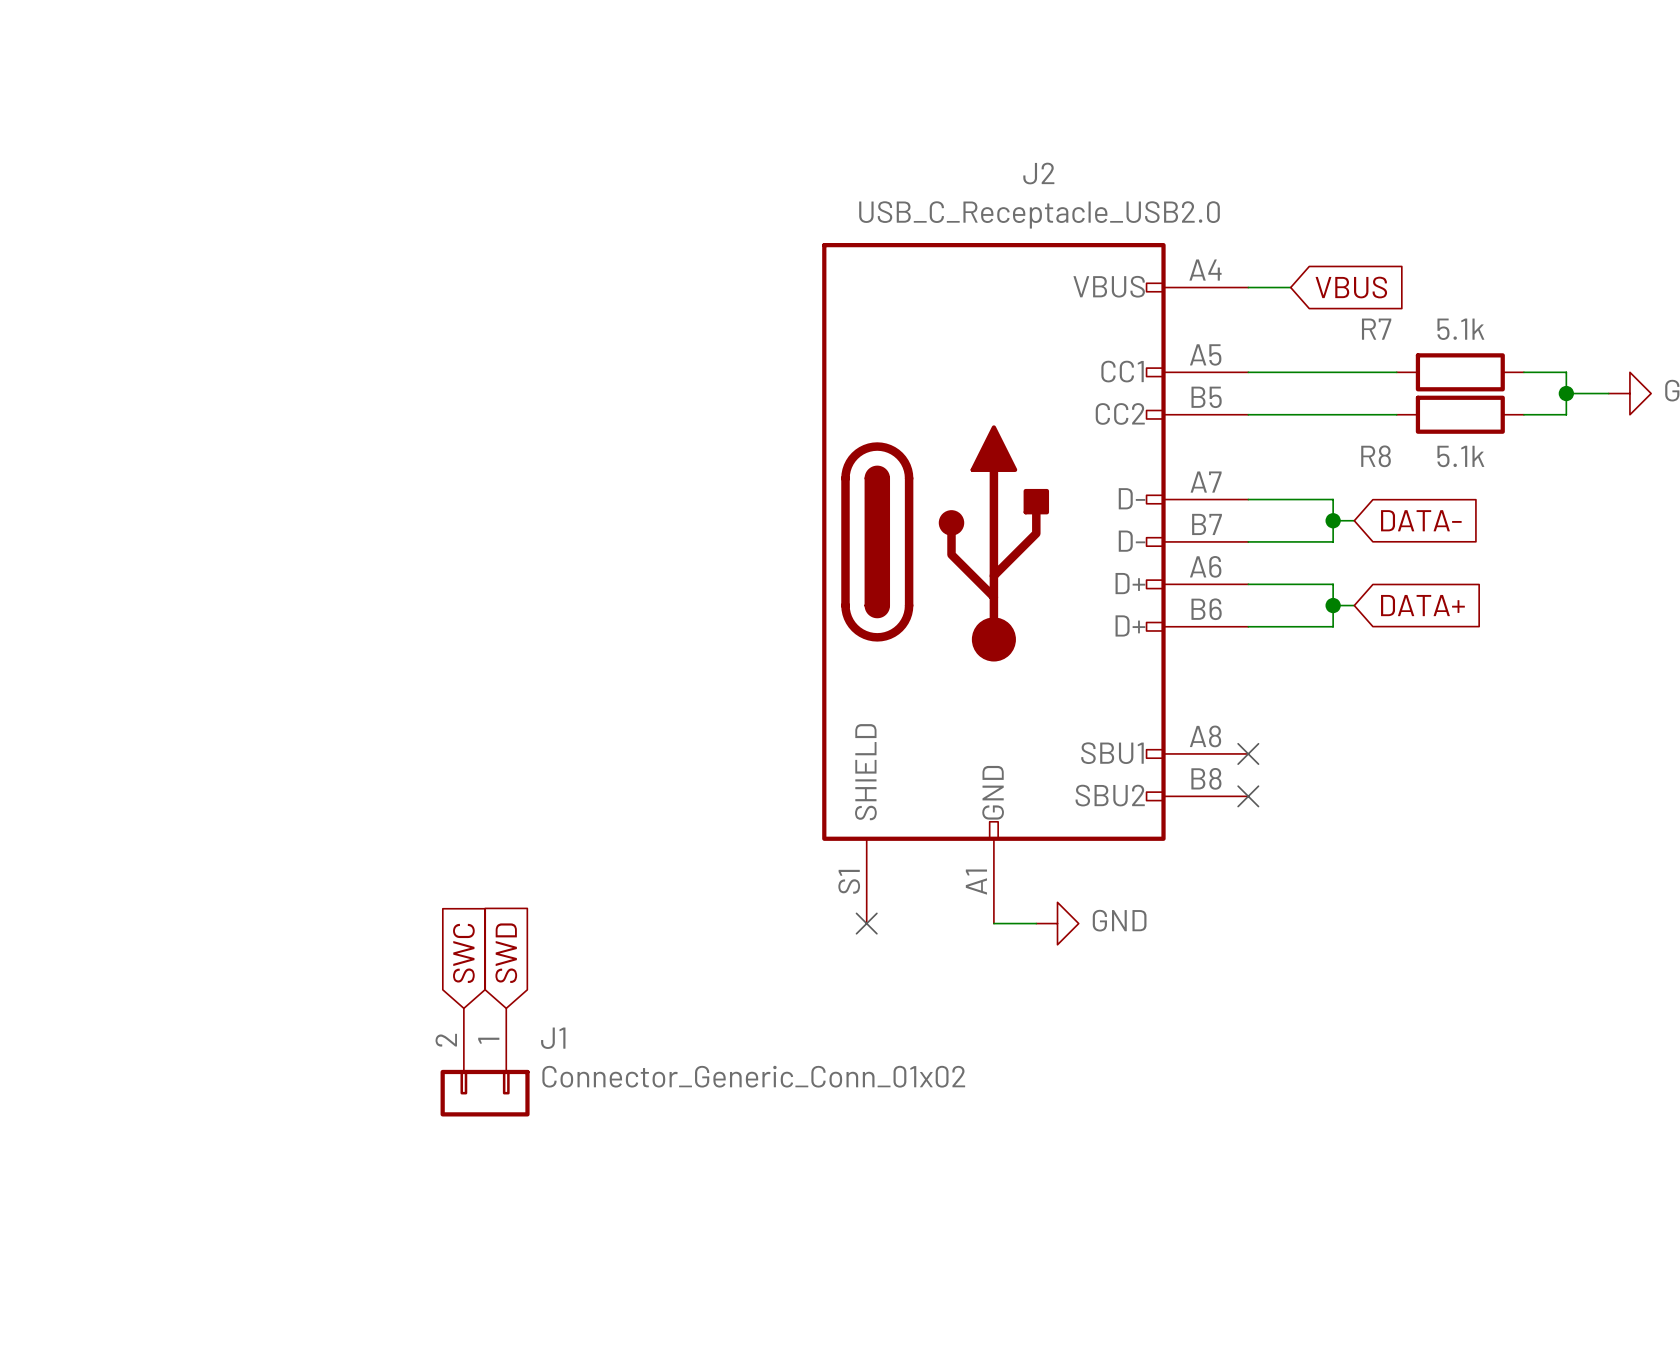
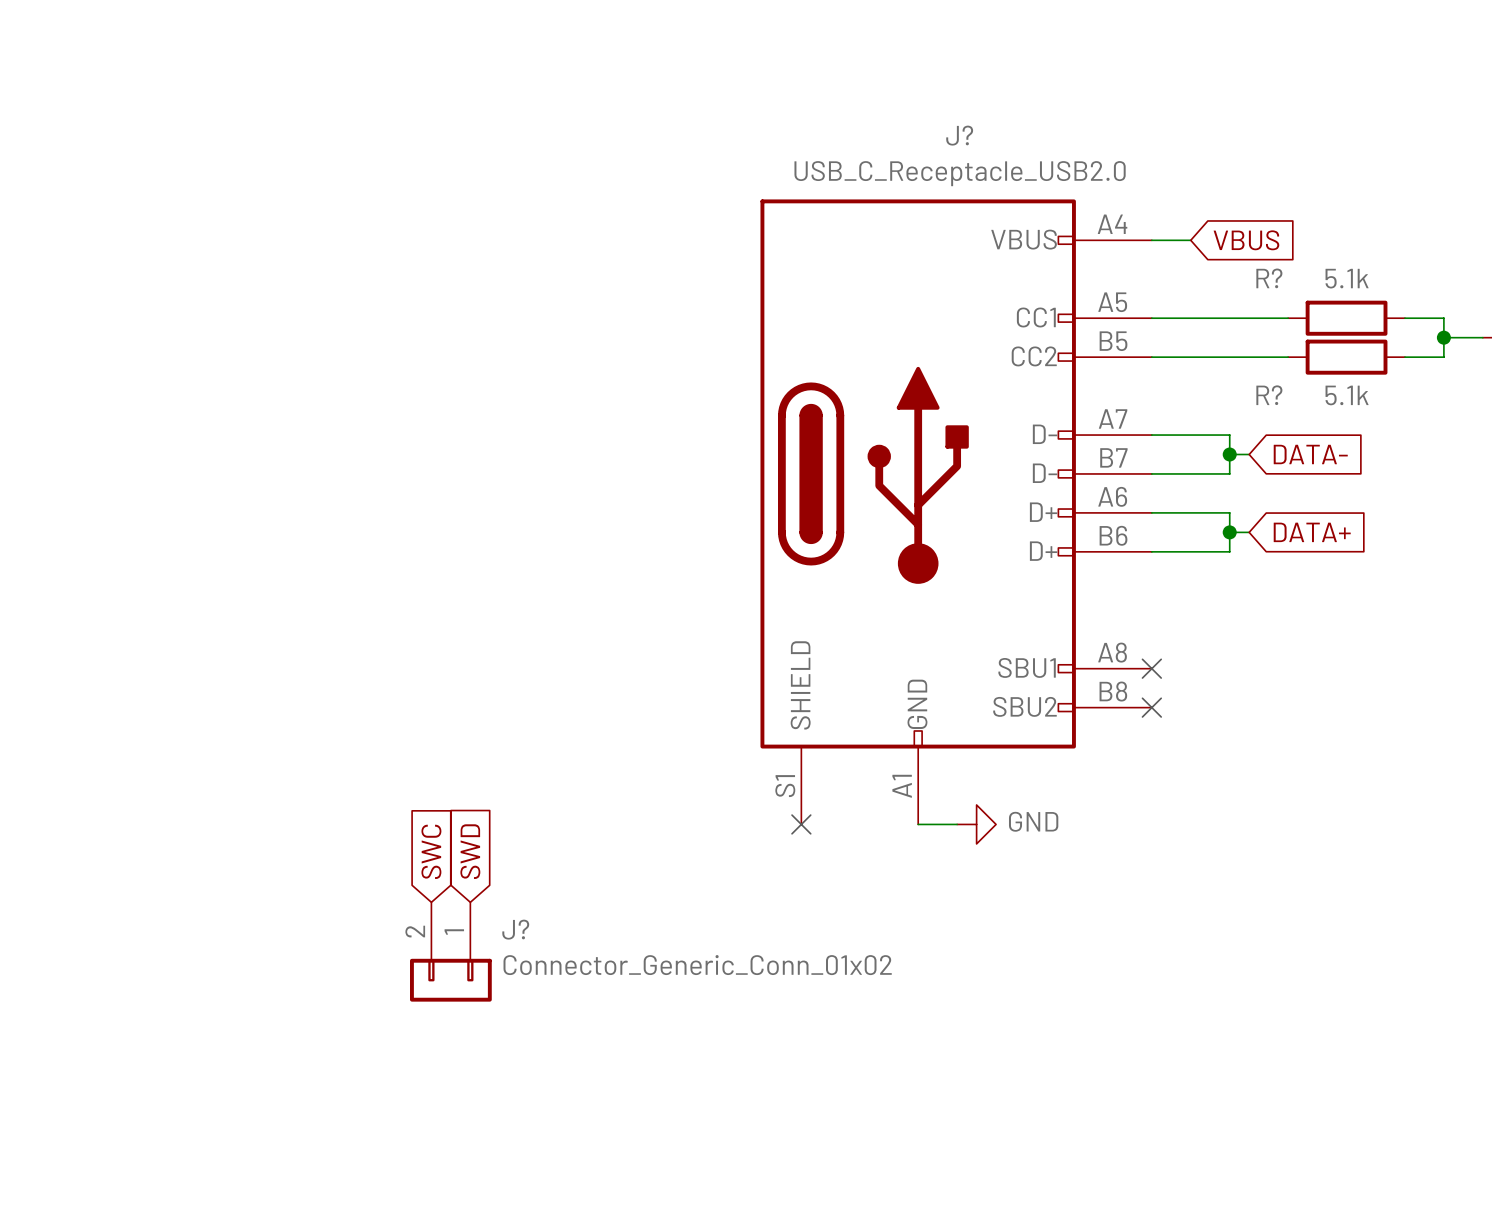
J2 name: J2 (1038, 173) -> J? (959, 135)
R7 name: R7 (1376, 329) -> R? (1269, 278)
R8 name: R8 (1376, 456) -> R? (1269, 395)
J1 name: J1 (553, 1038) -> J? (515, 929)

